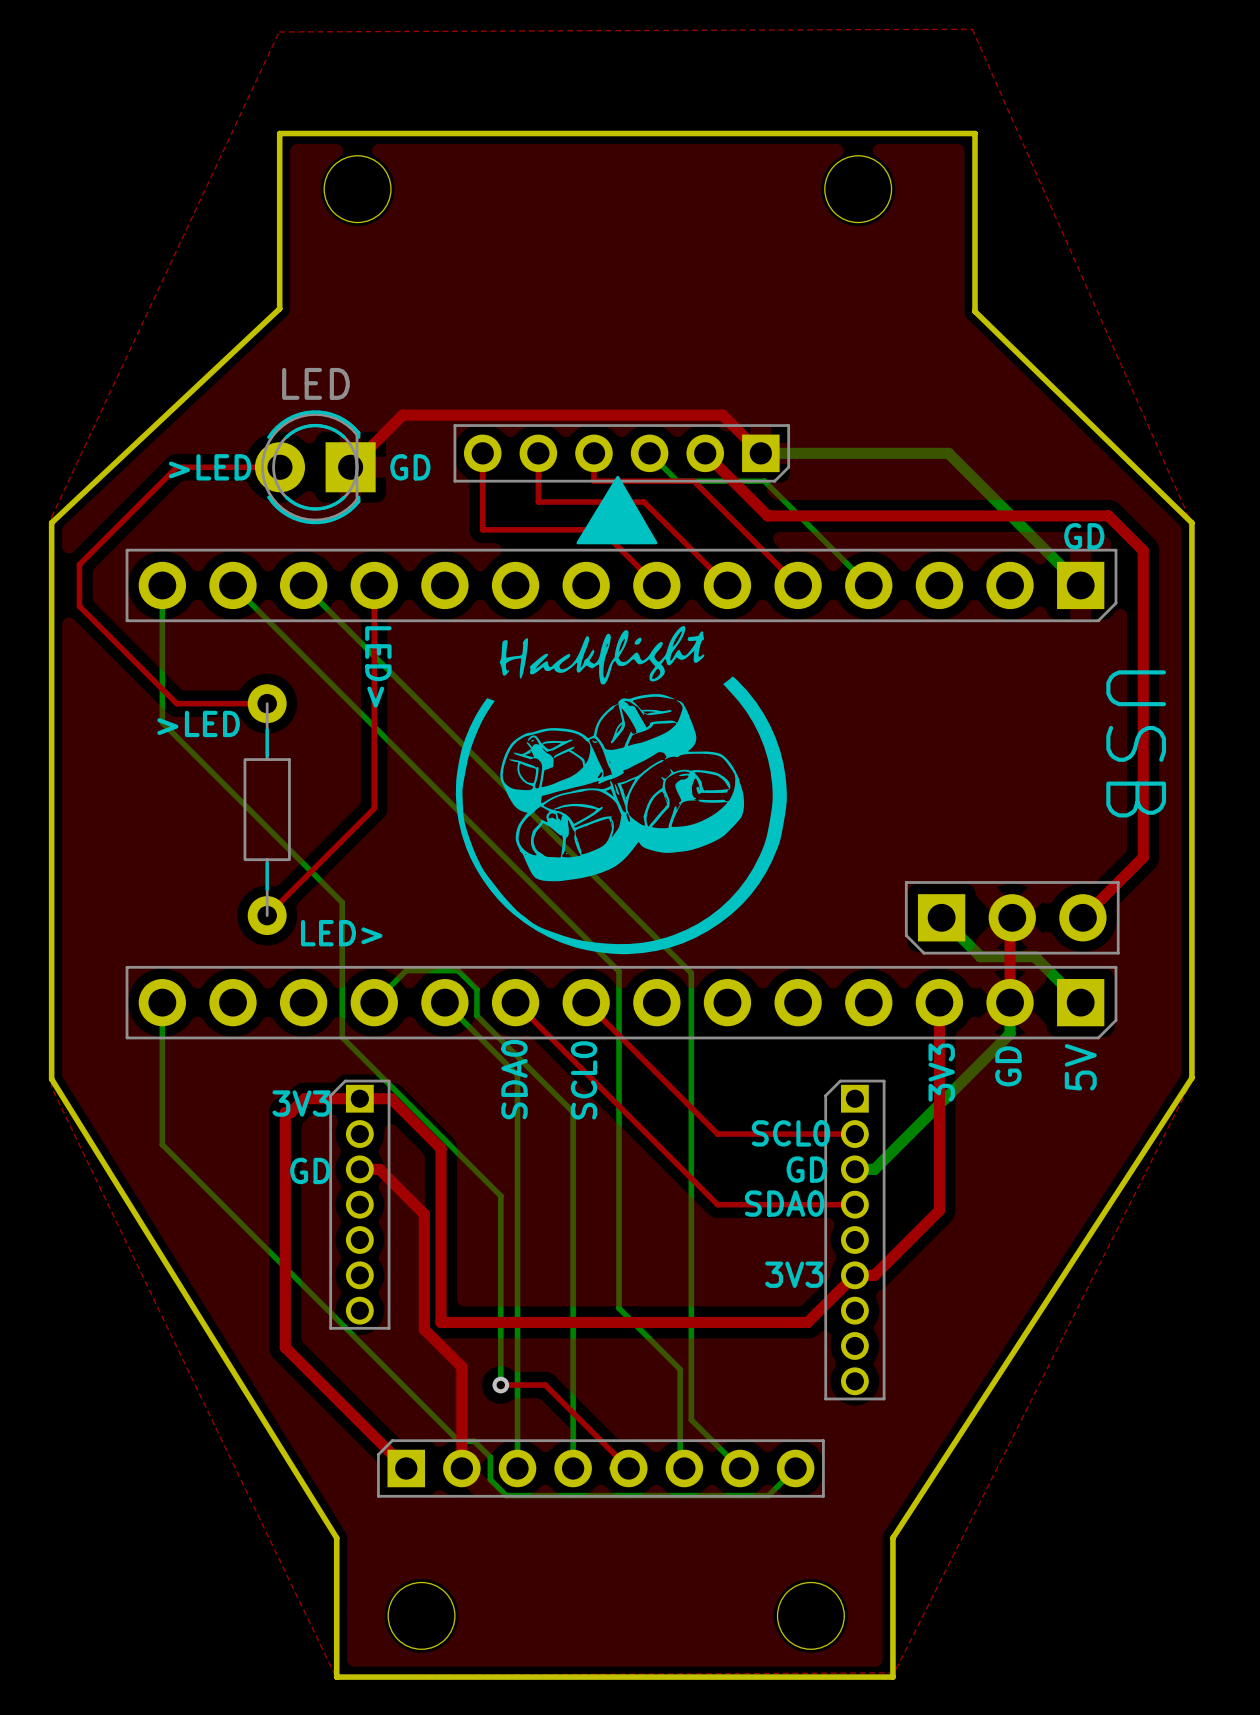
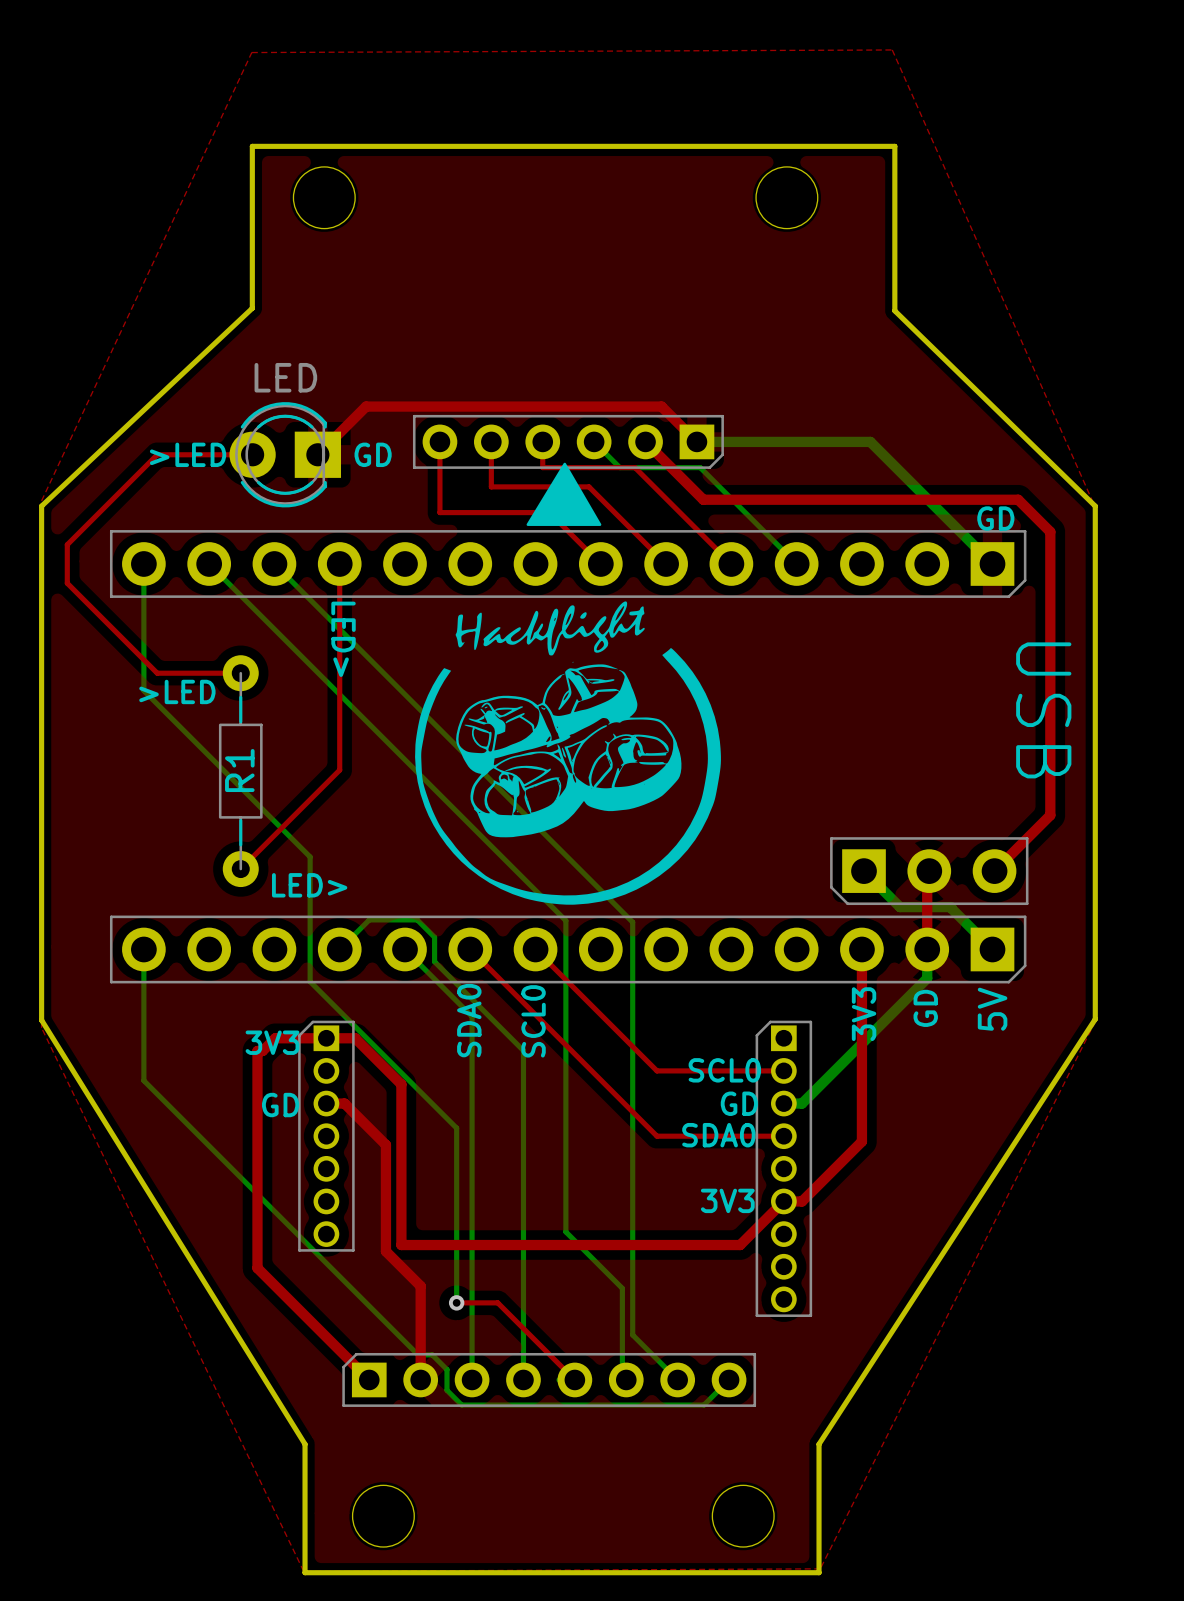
R1 name: none -> R1 (239, 770)

